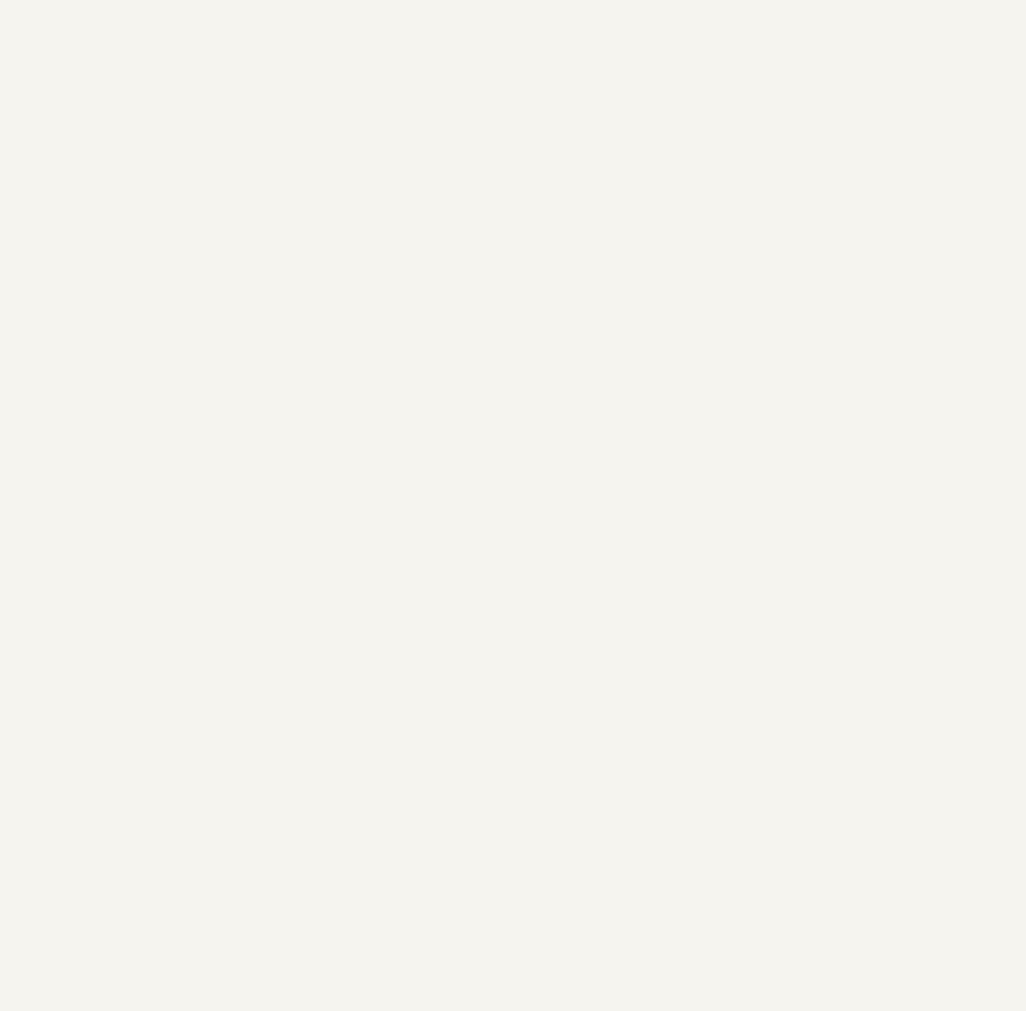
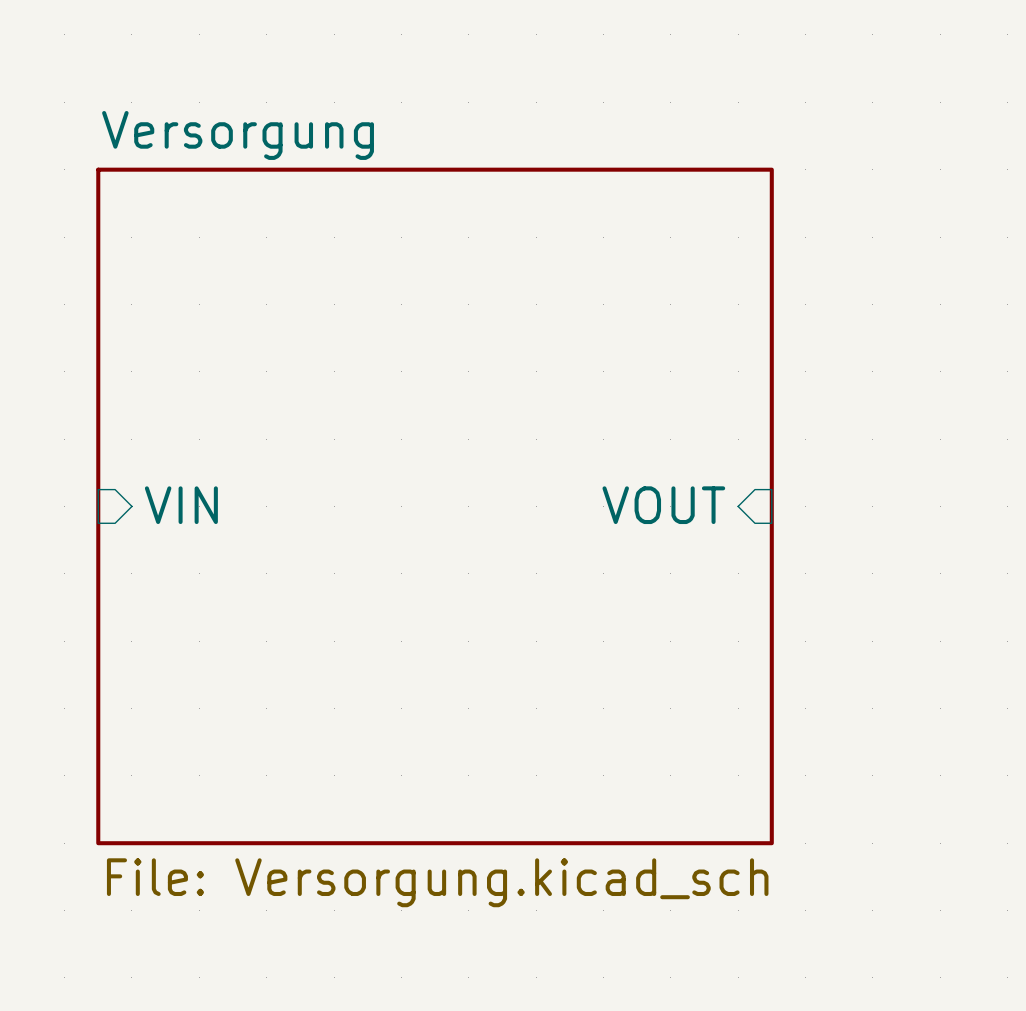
sheet pin: none -> VIN (181, 505)
sheet pin: none -> VOUT (663, 505)
sheet Versorgung: none -> File: Versorgung.kicad_sch (435, 506)

